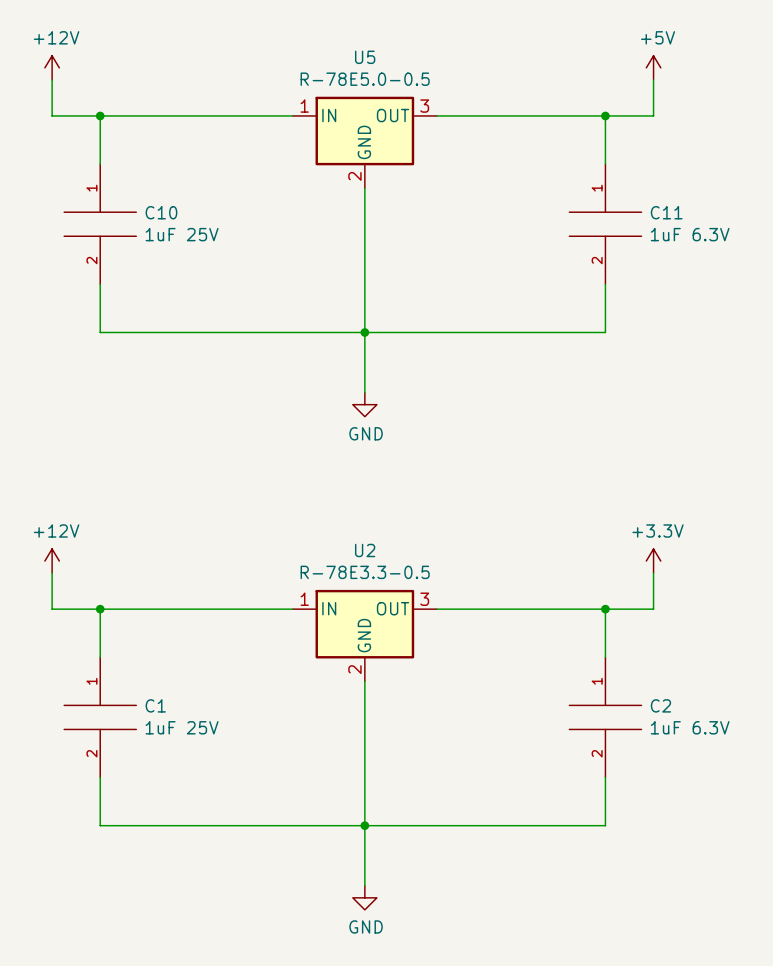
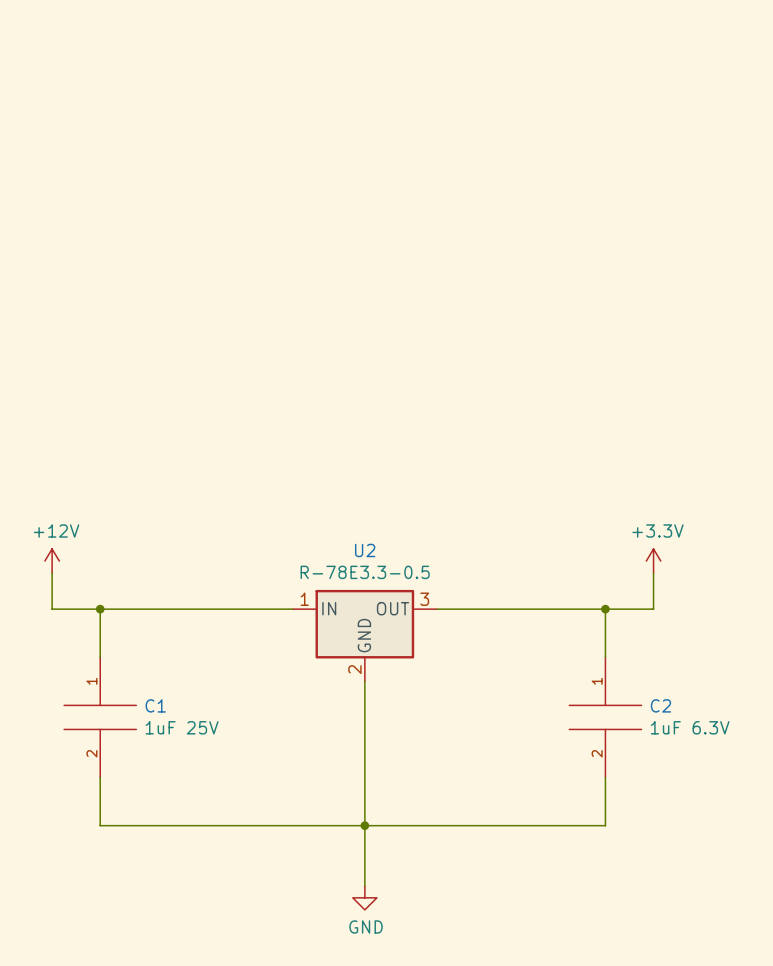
power symbol: +12V (52, 67) -> none
power symbol: +5V (653, 67) -> none
wire: (52, 79) (52, 115) (292, 115) -> none
wire: (653, 79) (653, 115) (437, 115) -> none
wire: (100, 115) (100, 164) -> none
junction: (100, 115) -> none
wire: (605, 115) (605, 164) -> none
junction: (605, 115) -> none
U5: R-78E5.0-0.5 (364, 142) -> none
wire: (364, 188) (364, 392) -> none
C10: 1uF 25V (100, 224) -> none
C11: 1uF 6.3V (605, 224) -> none
wire: (100, 284) (100, 332) (605, 332) (605, 284) -> none
junction: (364, 332) -> none
power symbol: GND (364, 404) -> none

